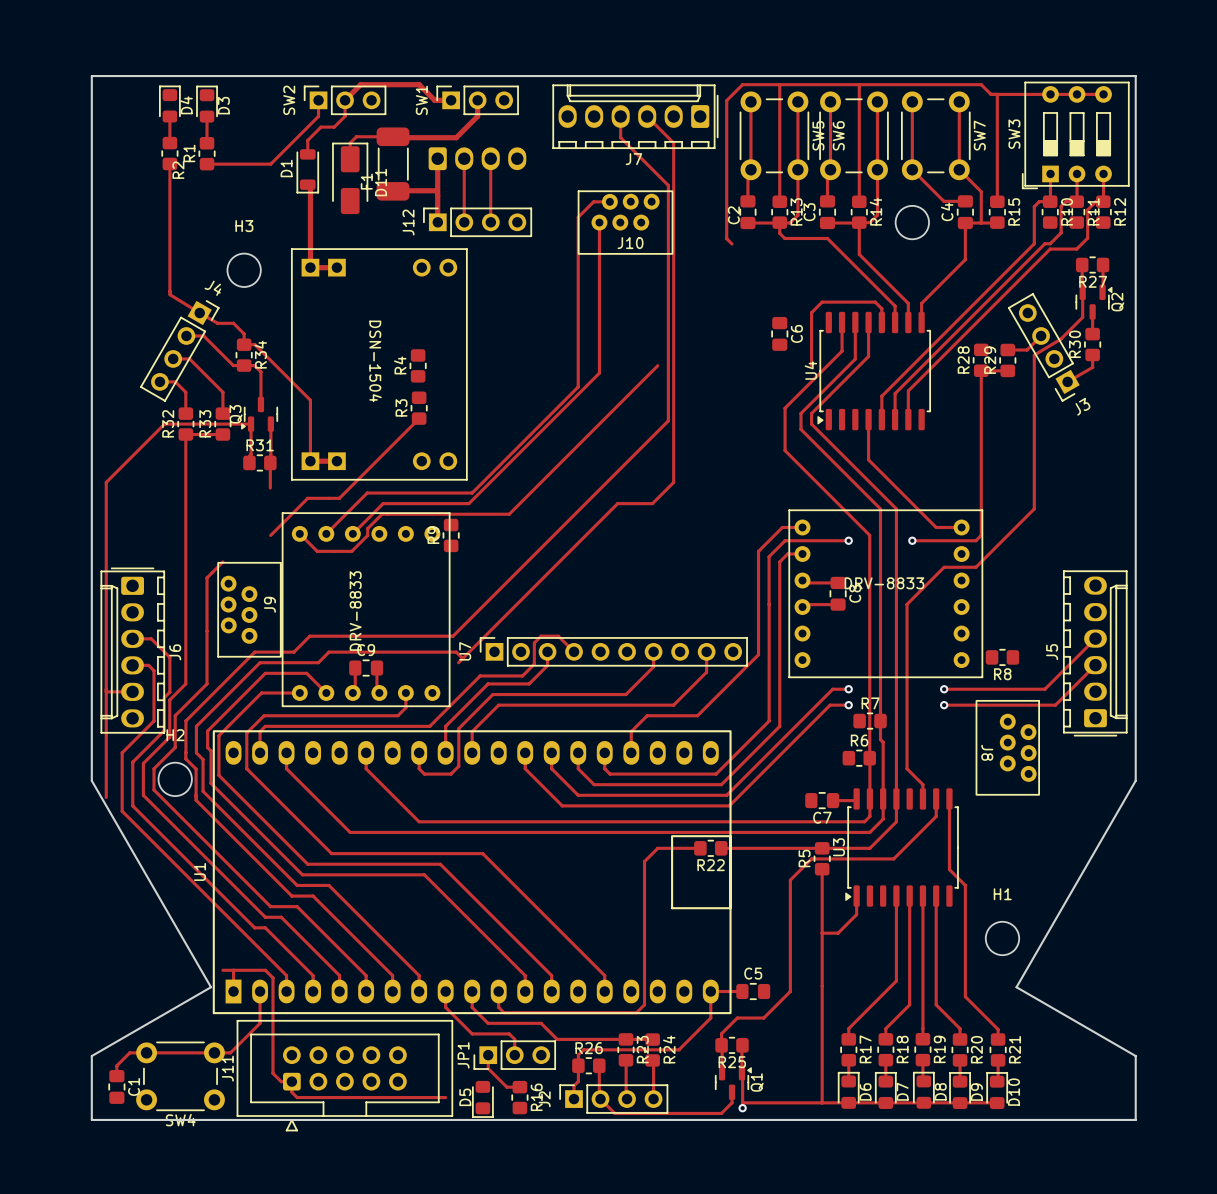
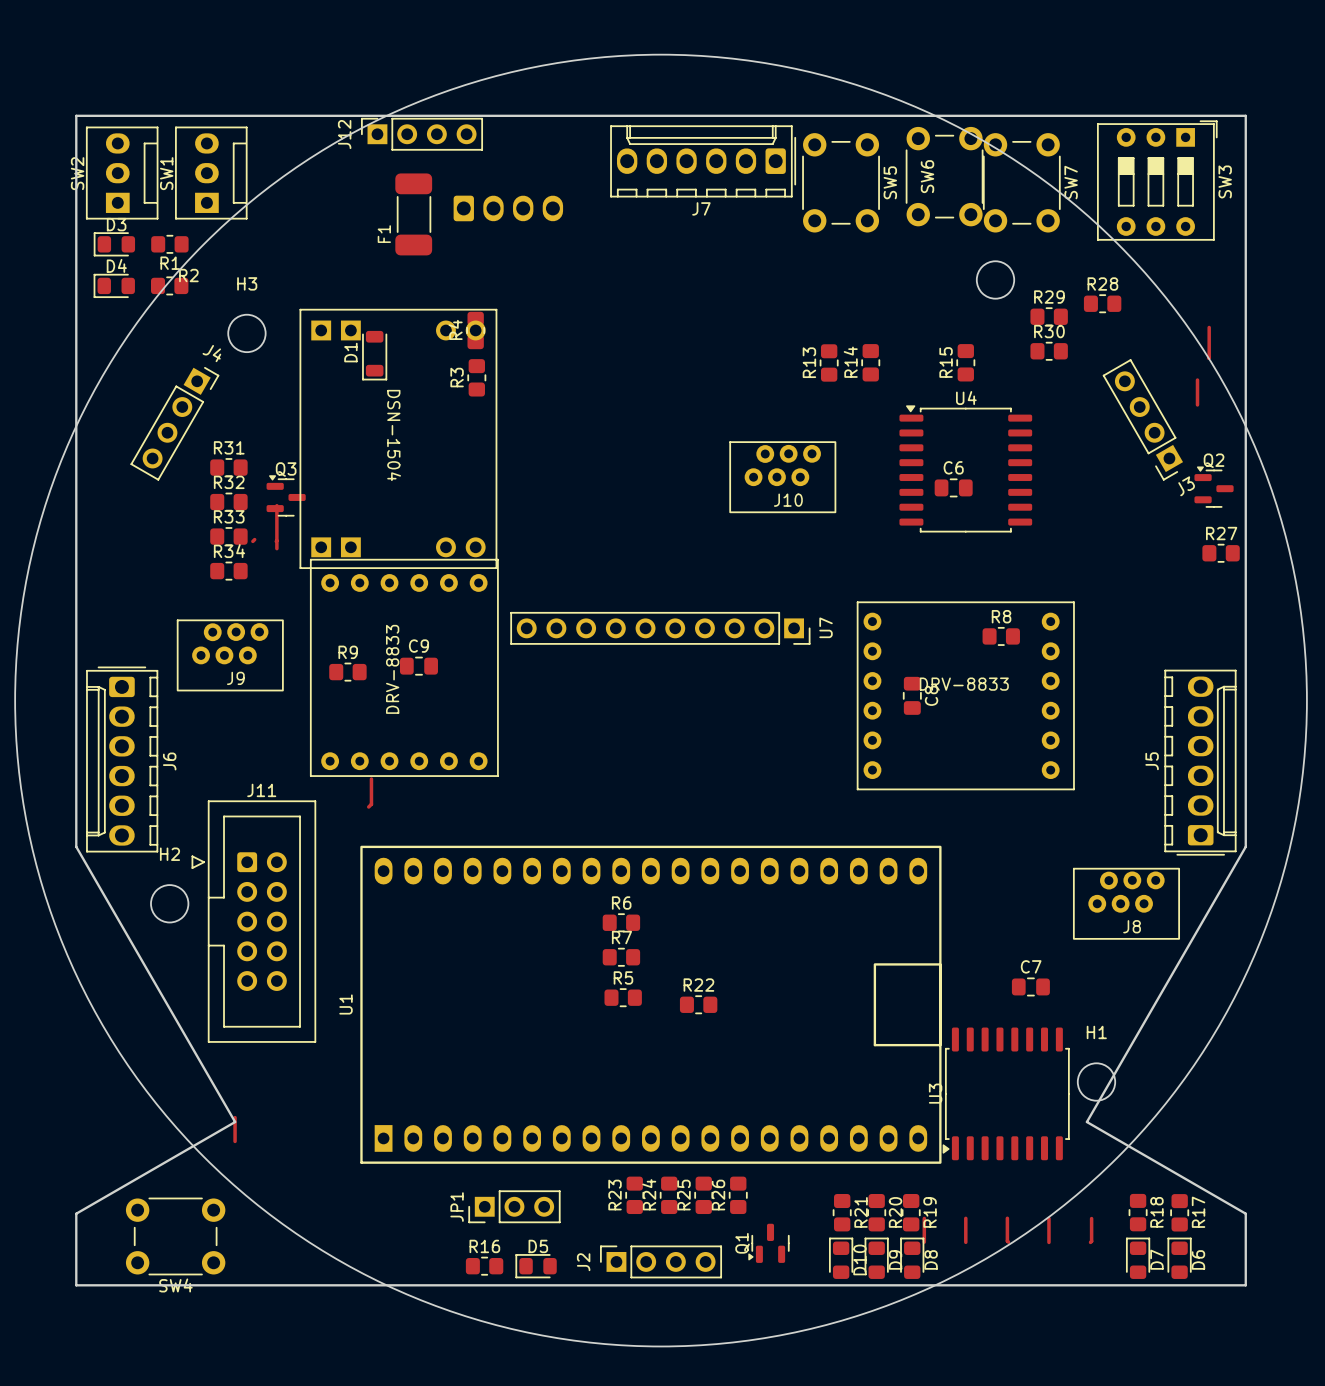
round board edge: none -> [14, 54, 1308, 1348]
track: (779, 84) (779, 201) -> none
track: (859, 84) (859, 201) -> none
SW2 footprint: [304, 85, 387, 115] -> [86, 126, 159, 220]
SW1 footprint: [436, 85, 519, 115] -> [175, 126, 248, 220]
track: (997, 94) (997, 201) -> none
track: (1103, 94) (990, 94) (981, 84) (742, 84) (726, 100) (726, 238) (732, 244) -> none
track: (318, 100) (318, 116) (270, 164) (207, 164) -> none
track: (451, 100) (434, 100) (419, 84) (360, 84) (345, 100) (345, 116) (334, 127) (321, 127) (307, 140) (307, 154) -> none
track: (477, 100) (477, 116) (456, 137) (392, 137) (387, 142) -> none
track: (750, 101) (750, 169) (747, 172) (747, 201) -> none
track: (797, 101) (797, 215) (790, 223) (753, 223) -> none
track: (830, 101) (830, 169) (827, 172) (827, 201) -> none
track: (877, 101) (877, 215) (870, 222) (827, 223) -> none
track: (912, 101) (912, 169) (943, 201) (965, 201) -> none
track: (959, 101) (959, 169) (981, 191) (981, 223) -> none
D4 rotation: 0° (169, 104) -> 90° counterclockwise (114, 285)
D4 position: (169, 104) -> (114, 285)
D3 rotation: 0° (207, 104) -> 90° counterclockwise (114, 244)
D3 position: (207, 104) -> (114, 244)
track: (169, 116) (169, 143) -> none
track: (207, 116) (207, 143) -> none
track: (620, 116) (620, 137) (668, 185) (668, 420) (453, 636) (309, 636) (293, 652) (254, 652) (185, 720) (185, 752) -> none
J7 position: (635, 116) -> (703, 161)
track: (647, 116) (673, 143) (673, 482) (652, 503) (617, 503) (458, 662) -> none
SW6 position: (854, 135) -> (944, 176)
SW3 rotation: 0° (1075, 135) -> 180° (1157, 180)
track: (393, 136) (356, 136) (350, 143) (350, 159) -> none
R2 rotation: 0° (169, 153) -> 90° clockwise (169, 285)
R2 position: (169, 153) -> (169, 285)
R1 name position: R1 (189, 153) -> R1 (170, 263)
R1 rotation: 0° (207, 153) -> 90° clockwise (169, 244)
R1 position: (207, 153) -> (169, 244)
track: (437, 158) (437, 222) -> none
track: (464, 158) (464, 222) -> none
track: (490, 158) (490, 222) -> none
track: (169, 163) (169, 291) -> none
R2 name position: R2 (178, 170) -> R2 (188, 275)
D1 position: (307, 171) -> (374, 355)
track: (1050, 173) (1050, 201) (1039, 201) (1034, 206) (1034, 243) (881, 396) (881, 419) -> none
track: (1077, 173) (1077, 201) (1066, 201) (1061, 206) (1061, 232) (1050, 243) (1044, 243) (895, 393) (895, 419) -> none
track: (1103, 173) (1103, 201) (1095, 201) (1087, 209) (1087, 238) (1076, 249) (1050, 249) (908, 390) (908, 419) -> none
D11: (350, 178) -> none
track: (307, 184) (310, 187) (310, 267) (336, 267) (334, 264) -> none
track: (436, 190) (393, 190) (387, 196) -> none
track: (609, 201) (593, 201) (578, 217) (578, 386) (472, 493) (367, 493) (326, 533) -> none
R13 name position: R13 (796, 211) -> R13 (809, 362)
R14 name position: R14 (875, 211) -> R14 (850, 362)
R15 name position: R15 (1014, 211) -> R15 (946, 362)
C2: (747, 212) -> none
R13 position: (779, 212) -> (829, 362)
C3: (827, 212) -> none
R14 position: (859, 212) -> (870, 362)
C4: (965, 212) -> none
R15 position: (997, 212) -> (965, 362)
R10: (1050, 212) -> none
R11: (1076, 212) -> none
R12: (1103, 212) -> none
J12 position: (477, 222) -> (422, 134)
track: (599, 222) (599, 373) (468, 503) (383, 503) (352, 533) -> none
J10 position: (625, 222) -> (782, 477)
track: (779, 222) (779, 233) (784, 238) (827, 238) (895, 306) (895, 322) -> none
track: (859, 222) (859, 254) (908, 303) (908, 322) -> none
track: (997, 222) (965, 223) (965, 259) (921, 303) (921, 322) -> none
track: (1082, 264) (1082, 317) (1060, 339) (1034, 355) (1034, 508) (975, 567) (944, 567) (907, 604) (907, 768) (922, 784) (922, 798) -> none
R27 position: (1092, 264) -> (1221, 553)
R27 name position: R27 (1093, 281) -> R27 (1221, 533)
track: (170, 291) (170, 294) (217, 323) (233, 323) (244, 333) (244, 344) (254, 344) (310, 400) (310, 461) (336, 461) -> none
Q2 rotation: 0° (1094, 302) -> 90° counterclockwise (1214, 487)
Q2 position: (1094, 302) -> (1214, 487)
track: (842, 322) (842, 351) (785, 408) (785, 450) (869, 535) (869, 816) (864, 821) (419, 821) (366, 768) (366, 752) -> none
track: (855, 322) (855, 359) (800, 413) (800, 429) (880, 508) (880, 739) (883, 742) (883, 819) (869, 832) (350, 832) (286, 768) (286, 752) -> none
track: (868, 322) (868, 356) (811, 413) (811, 424) (896, 508) (896, 821) (869, 848) (721, 848) -> none
track: (881, 322) (881, 308) (875, 302) (822, 302) (811, 312) (811, 365) -> none
C6 rotation: 0° (779, 333) -> 90° clockwise (953, 487)
C6 position: (779, 333) -> (953, 487)
C6 name position: C6 (796, 333) -> C6 (953, 467)
track: (186, 335) (203, 335) (233, 365) (254, 365) (260, 371) (260, 397) -> none
track: (1041, 335) (1027, 350) (1007, 350) -> none
R30 rotation: 0° (1092, 344) -> 90° clockwise (1049, 351)
R30 position: (1092, 344) -> (1049, 351)
R34 name position: R34 (260, 354) -> R34 (229, 551)
track: (1092, 354) (1092, 367) (1067, 381) -> none
R34 rotation: 0° (244, 355) -> 90° clockwise (228, 571)
R34 position: (244, 355) -> (228, 571)
track: (173, 358) (189, 358) (222, 392) (222, 413) -> none
R28 rotation: 0° (981, 360) -> 90° clockwise (1102, 303)
R28 position: (981, 360) -> (1102, 303)
R29 rotation: 0° (1007, 360) -> 90° clockwise (1049, 316)
R29 position: (1007, 360) -> (1049, 316)
R4 position: (418, 365) -> (475, 330)
track: (657, 365) (509, 514) (382, 514) (367, 528) (367, 535) (351, 551) (317, 551) (299, 533) -> none
track: (1007, 370) (981, 370) (981, 535) (975, 540) (912, 540) -> none
U4 rotation: 0° (874, 371) -> 90° clockwise (965, 468)
track: (159, 381) (175, 381) (185, 392) (185, 413) -> none
R3 position: (419, 408) -> (476, 377)
Q3 rotation: 0° (259, 414) -> 90° clockwise (286, 495)
track: (419, 418) (339, 498) (307, 498) (270, 535) -> none
track: (868, 419) (868, 459) (936, 527) (961, 527) -> none
R32 rotation: 0° (185, 424) -> 90° clockwise (228, 502)
R32 position: (185, 424) -> (228, 502)
R33 rotation: 0° (222, 424) -> 90° clockwise (228, 536)
R33 position: (222, 424) -> (228, 536)
track: (222, 434) (185, 434) (185, 683) (169, 699) (169, 737) (143, 763) (143, 795) (265, 917) (281, 917) (339, 975) (339, 991) -> none
track: (251, 461) (251, 424) (164, 424) (106, 482) (106, 797) -> none
R31 position: (259, 462) -> (228, 467)
track: (270, 462) (270, 488) -> none
track: (802, 527) (782, 527) (758, 551) (758, 654) (697, 715) (647, 715) (631, 731) (631, 752) -> none
R9 rotation: 0° (451, 535) -> 90° clockwise (347, 672)
R9 position: (451, 535) -> (347, 672)
track: (848, 540) (785, 540) (769, 556) (769, 721) (716, 774) (610, 774) (604, 768) (604, 752) -> none
via: (848, 540) -> none
via: (912, 540) -> none
track: (802, 554) (787, 554) (779, 561) (779, 726) (721, 784) (594, 784) (578, 768) (578, 752) -> none
track: (222, 561) (207, 577) (207, 683) (175, 715) (175, 747) (153, 768) (153, 789) (270, 906) (297, 906) (366, 975) (366, 991) -> none
track: (802, 580) (804, 582) (838, 582) -> none
track: (838, 604) (804, 604) (802, 607) -> none
J9 rotation: 0° (249, 609) -> 90° clockwise (230, 655)
part position: (366, 609) -> (404, 667)
track: (132, 638) (151, 638) (169, 657) (169, 692) (164, 697) (164, 730) (132, 762) (132, 805) (254, 927) (265, 927) (313, 975) (313, 991) -> none
track: (1095, 638) (1044, 689) (944, 689) -> none
track: (547, 651) (547, 665) (529, 683) (488, 683) (445, 726) (445, 752) -> none
track: (574, 651) (558, 636) (541, 636) (534, 642) (534, 664) (522, 675) (480, 675) (429, 726) (265, 726) (260, 731) (260, 752) -> none
U7 rotation: 0° (613, 651) -> 180° (660, 628)
track: (653, 651) (653, 666) (625, 694) (492, 694) (458, 728) (458, 766) (450, 774) (424, 774) (419, 768) (419, 752) -> none
track: (706, 651) (706, 672) (673, 705) (498, 705) (472, 731) (472, 752) -> none
R8 position: (1002, 657) -> (1001, 636)
track: (462, 658) (456, 652) (328, 652) (318, 662) (260, 662) (196, 726) (196, 752) (203, 759) (203, 791) (297, 885) (328, 885) (419, 975) (419, 991) -> none
track: (132, 665) (148, 665) (153, 670) (153, 721) (122, 752) (122, 811) (286, 975) (286, 991) -> none
track: (1095, 665) (1055, 705) (944, 705) -> none
C9 position: (366, 668) -> (418, 666)
track: (376, 668) (376, 690) (379, 692) -> none
R8 name position: R8 (1002, 674) -> R8 (1001, 616)
track: (848, 689) (832, 689) (726, 795) (578, 795) (551, 768) (551, 752) -> none
via: (848, 689) -> none
via: (944, 689) -> none
track: (106, 691) (132, 691) -> none
track: (299, 692) (261, 692) (218, 735) (218, 775) (307, 864) (440, 864) (551, 975) (551, 991) -> none
track: (326, 692) (306, 673) (265, 673) (207, 731) (207, 747) (211, 750) (211, 783) (302, 874) (424, 874) (525, 975) (525, 991) -> none
track: (405, 692) (405, 707) (397, 715) (264, 715) (246, 732) (246, 768) (331, 853) (482, 853) (604, 975) (604, 991) -> none
track: (848, 705) (830, 705) (729, 805) (562, 805) (525, 768) (525, 752) -> none
via: (848, 705) -> none
via: (944, 705) -> none
R7 position: (870, 721) -> (621, 957)
board edge: (91, 728) (91, 780) (211, 987) -> (76, 846) (235, 1122) (209, 1136)
board edge: (1135, 728) (1135, 780) (1016, 987) -> (1245, 846) (1086, 1122) (1112, 1136)
J8 rotation: 0° (1007, 747) -> 90° counterclockwise (1126, 903)
track: (185, 752) (185, 758) (196, 769) (196, 800) (291, 896) (313, 896) (392, 975) (392, 991) -> none
R6 position: (859, 758) -> (621, 922)
track: (856, 798) (838, 800) -> none
track: (936, 798) (936, 816) (893, 858) (811, 858) (790, 880) (790, 991) (763, 1018) (737, 1018) (721, 1033) (722, 1072) -> none
track: (949, 798) (949, 869) (965, 885) (965, 996) (998, 1029) (998, 1039) -> none
C7 position: (822, 800) -> (1030, 986)
C7 name position: C7 (822, 817) -> C7 (1031, 966)
U3 position: (901, 847) -> (1006, 1093)
track: (700, 848) (657, 848) (644, 861) (644, 1004) (636, 1012) (503, 1012) (498, 1007) (498, 991) -> none
R22 position: (710, 848) -> (698, 1004)
R5 rotation: 0° (822, 858) -> 90° clockwise (623, 997)
R5 position: (822, 858) -> (623, 997)
R22 name position: R22 (711, 865) -> R22 (698, 985)
track: (822, 869) (822, 1102) -> none
U1 position: (472, 872) -> (650, 1004)
track: (856, 896) (856, 914) (838, 933) (822, 933) -> none
track: (896, 896) (896, 980) (848, 1028) (848, 1039) -> none
track: (909, 896) (909, 1004) (885, 1028) (885, 1039) -> none
track: (922, 896) (922, 1039) -> none
track: (936, 896) (936, 1004) (960, 1028) (960, 1039) -> none
track: (222, 970) (265, 970) (272, 977) (272, 1073) (281, 1081) (291, 1081) (291, 1092) (297, 1097) (445, 1097) -> none
track: (260, 991) (260, 1023) (230, 1052) (129, 1052) (116, 1065) (116, 1076) -> none
track: (445, 991) (445, 1007) (472, 1033) (509, 1033) (514, 1039) (514, 1049) -> none
track: (472, 991) (472, 1007) (488, 1023) (541, 1023) (557, 1039) (652, 1039) -> none
track: (742, 991) (710, 991) (710, 1018) (678, 1049) (583, 1049) (578, 1054) (578, 1081) (574, 1085) (574, 1099) -> none
C5: (753, 991) -> none
R25 rotation: 0° (732, 1045) -> 90° clockwise (703, 1195)
R25 position: (732, 1045) -> (703, 1195)
track: (742, 1045) (742, 1108) -> none
R26 name position: R26 (589, 1048) -> R26 (718, 1195)
R23 position: (625, 1049) -> (634, 1195)
R23 name position: R23 (642, 1049) -> R23 (615, 1195)
R24 name position: R24 (669, 1049) -> R24 (649, 1194)
R17 position: (848, 1049) -> (1179, 1212)
R18 position: (885, 1049) -> (1138, 1212)
R19 position: (922, 1049) -> (911, 1212)
R20 position: (960, 1049) -> (876, 1212)
R21 position: (998, 1049) -> (842, 1212)
R24 position: (652, 1050) -> (669, 1195)
track: (488, 1055) (488, 1068) (506, 1087) (514, 1087) -> none
JP1 position: (514, 1055) -> (514, 1206)
R26 rotation: 0° (588, 1065) -> 90° clockwise (738, 1195)
R26 position: (588, 1065) -> (738, 1195)
track: (599, 1065) (599, 1097) (614, 1113) (721, 1113) (732, 1102) (732, 1092) -> none
track: (626, 1065) (627, 1099) -> none
track: (653, 1066) (653, 1099) -> none
J11 rotation: 0° (344, 1075) -> 90° clockwise (253, 921)
J11 position: (344, 1075) -> (253, 921)
Q1 rotation: 0° (733, 1082) -> 180° (768, 1243)
Q1 position: (733, 1082) -> (768, 1243)
C1: (116, 1086) -> none
D6 position: (848, 1090) -> (1179, 1258)
D7 position: (885, 1090) -> (1138, 1258)
D8 position: (923, 1090) -> (912, 1258)
D9 position: (960, 1090) -> (876, 1258)
D10 position: (997, 1090) -> (841, 1258)
R16 rotation: 0° (519, 1097) -> 90° clockwise (484, 1266)
R16 position: (519, 1097) -> (484, 1266)
R16 name position: R16 (536, 1097) -> R16 (484, 1246)
D5 rotation: 0° (482, 1099) -> 90° clockwise (536, 1266)
track: (742, 1102) (997, 1103) -> none
via: (742, 1108) -> none

